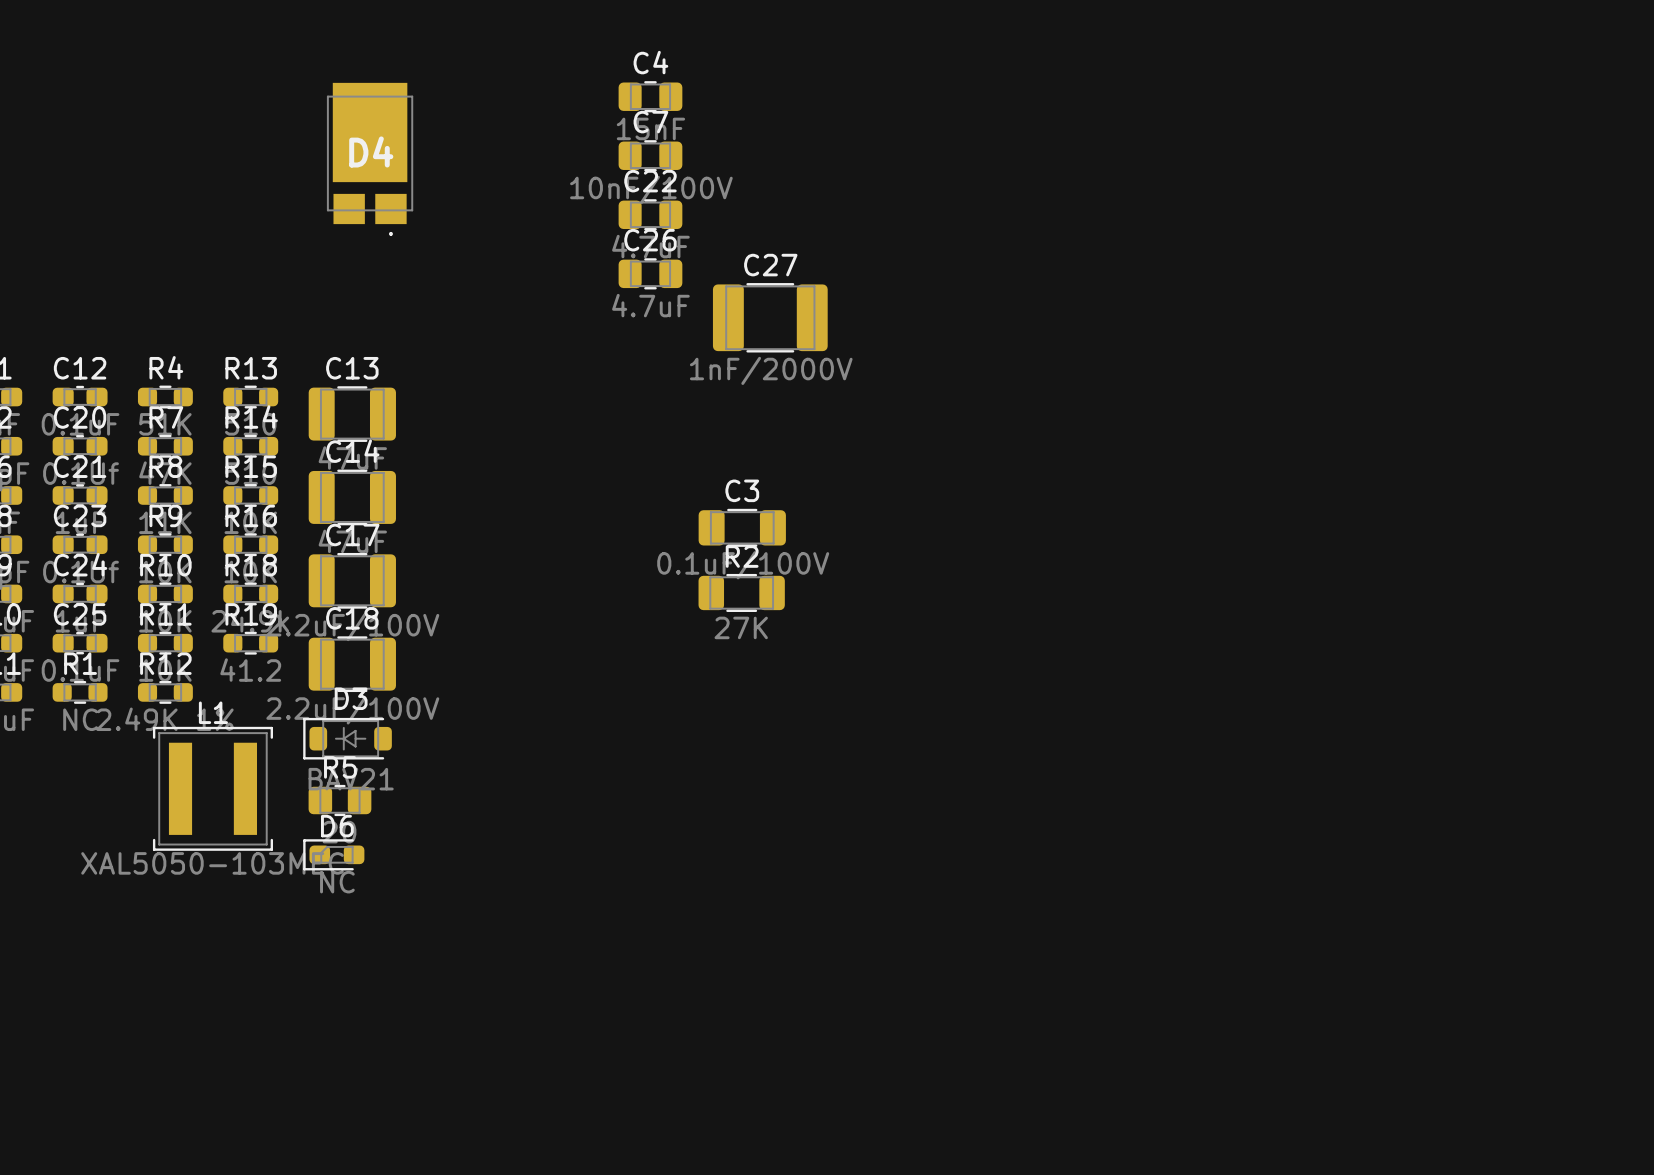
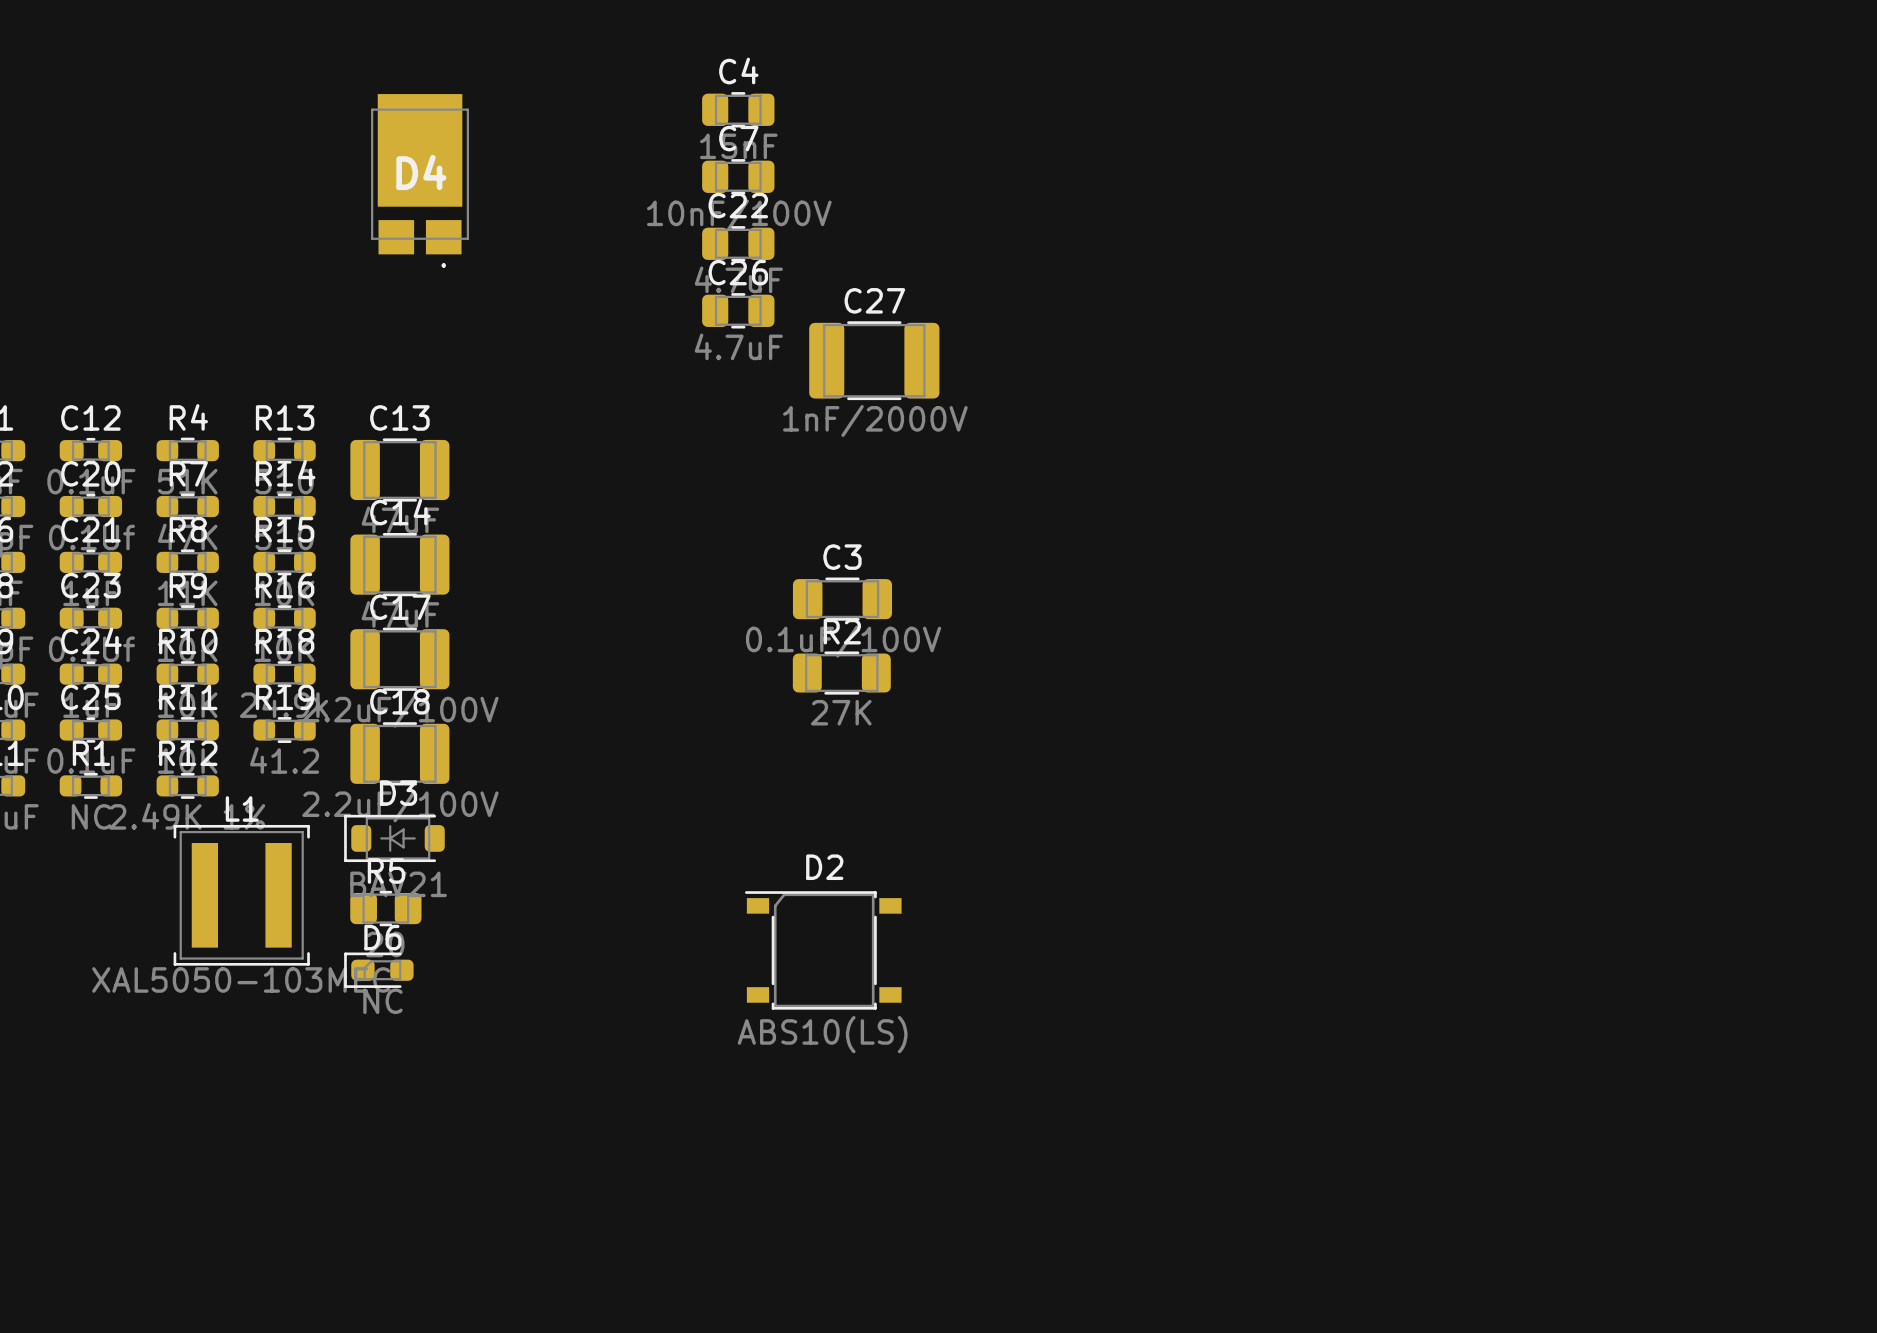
D2: none -> ABS10(LS) (823, 950)

